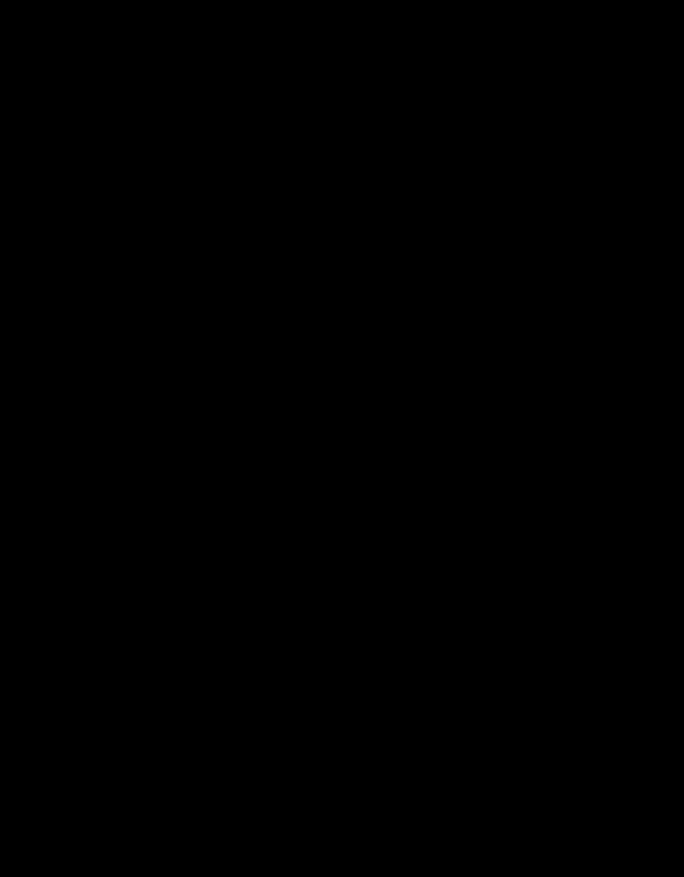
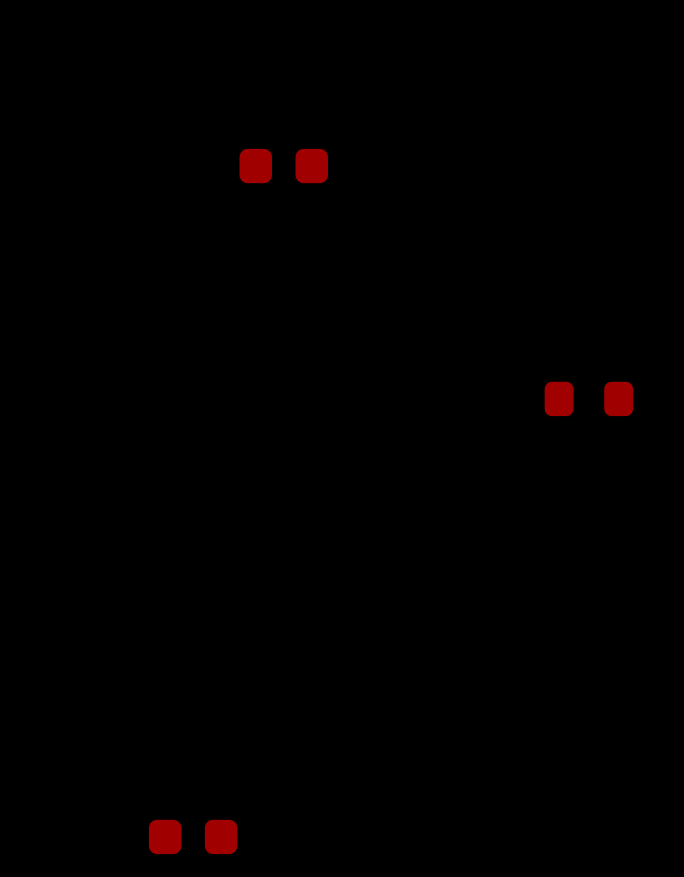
part: none -> (283, 166)
part: none -> (588, 398)
part: none -> (193, 836)

